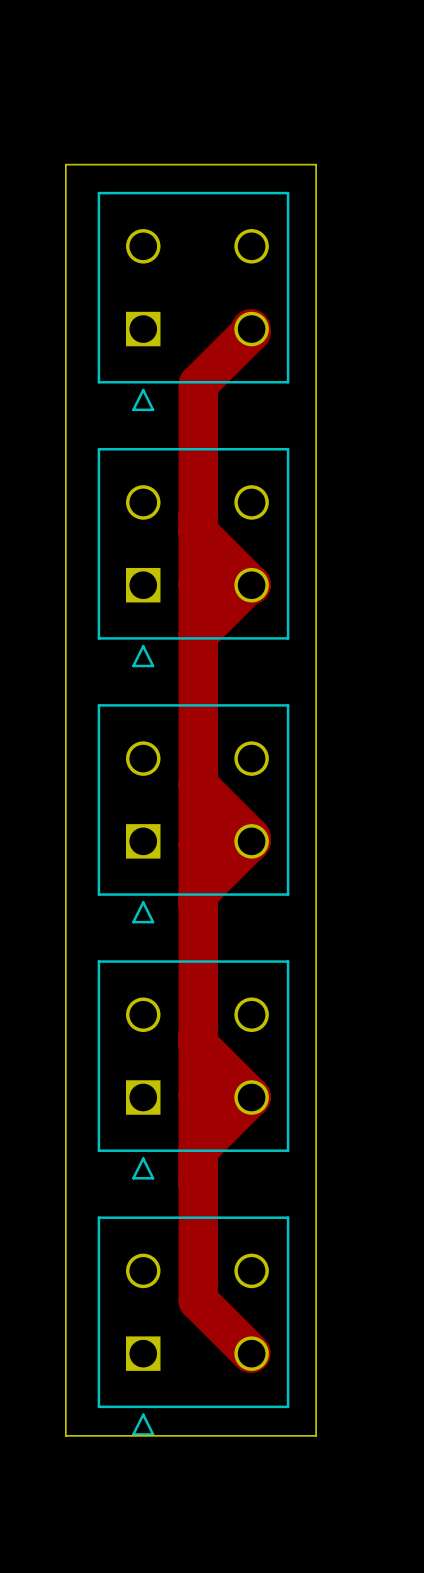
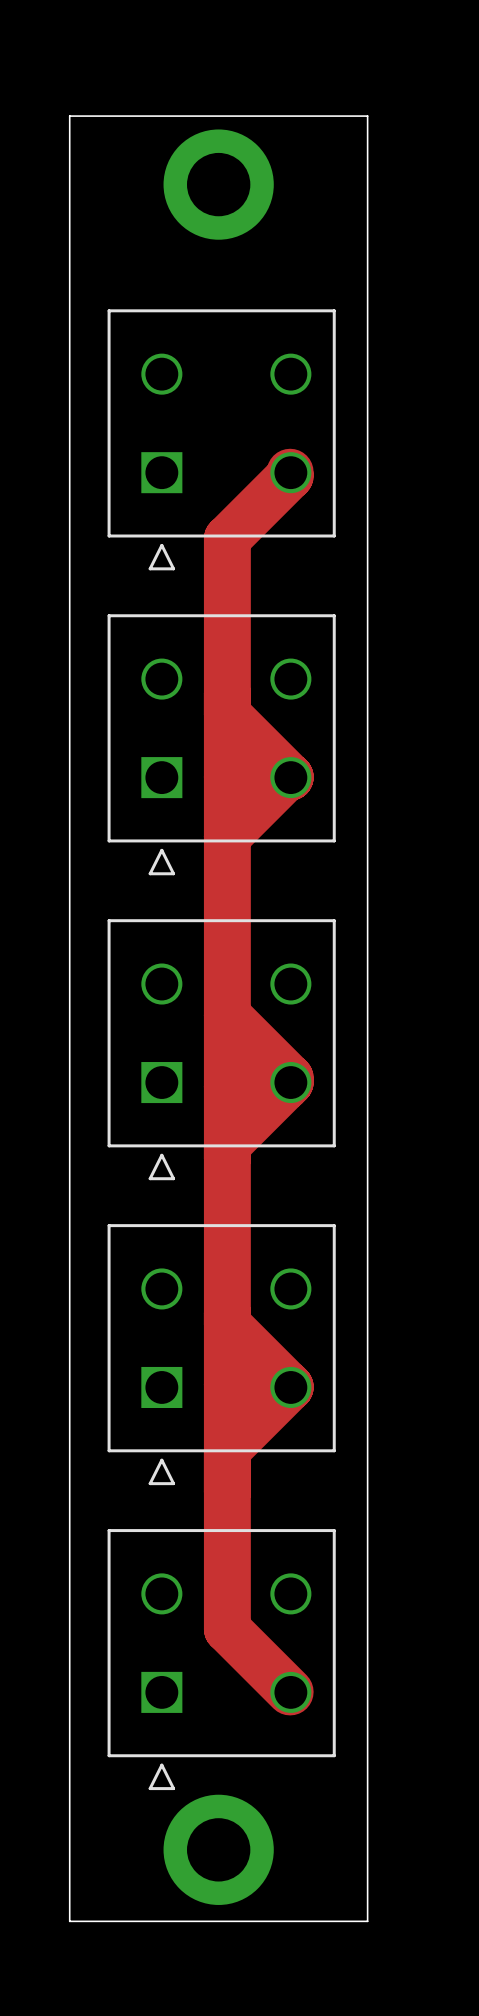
part: none -> (218, 184)
board edge: (65, 164) (316, 164) -> (69, 276) (69, 116) (367, 116) (367, 276)
board edge: (65, 1435) (316, 1435) -> (69, 1790) (69, 1921) (367, 1921) (367, 1790)
part: none -> (218, 1849)

